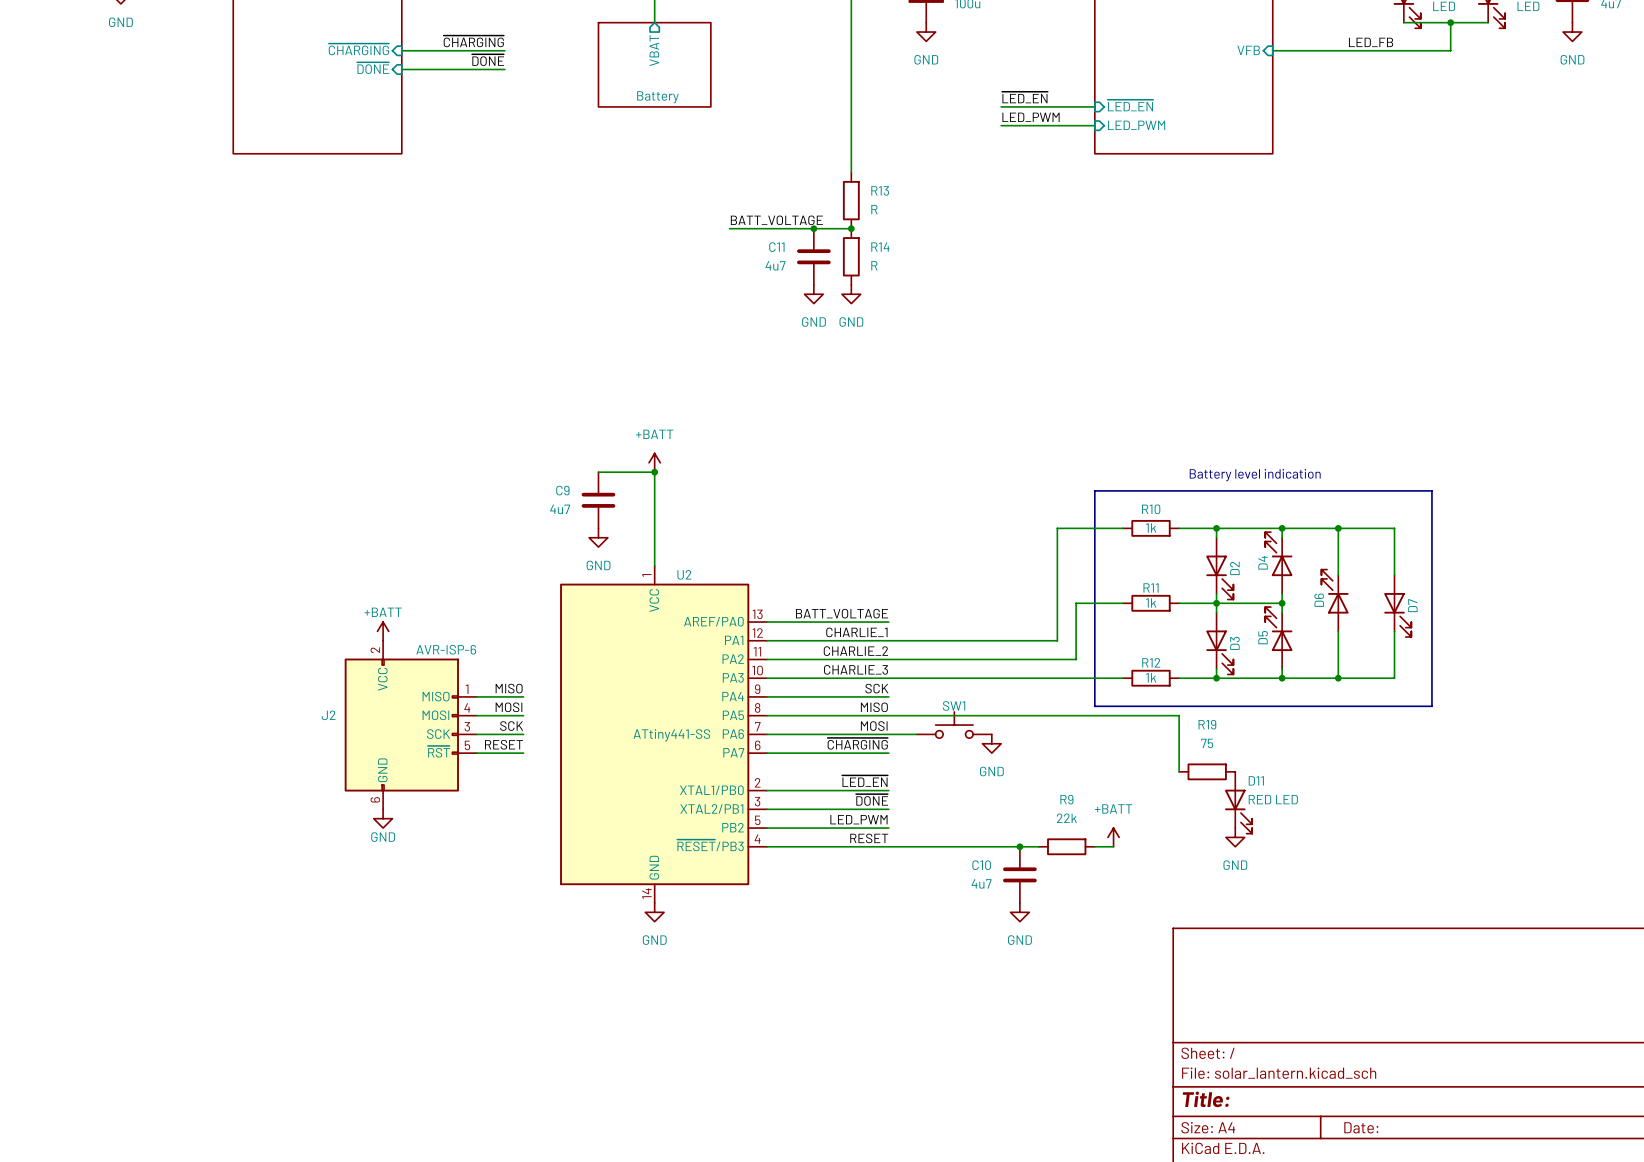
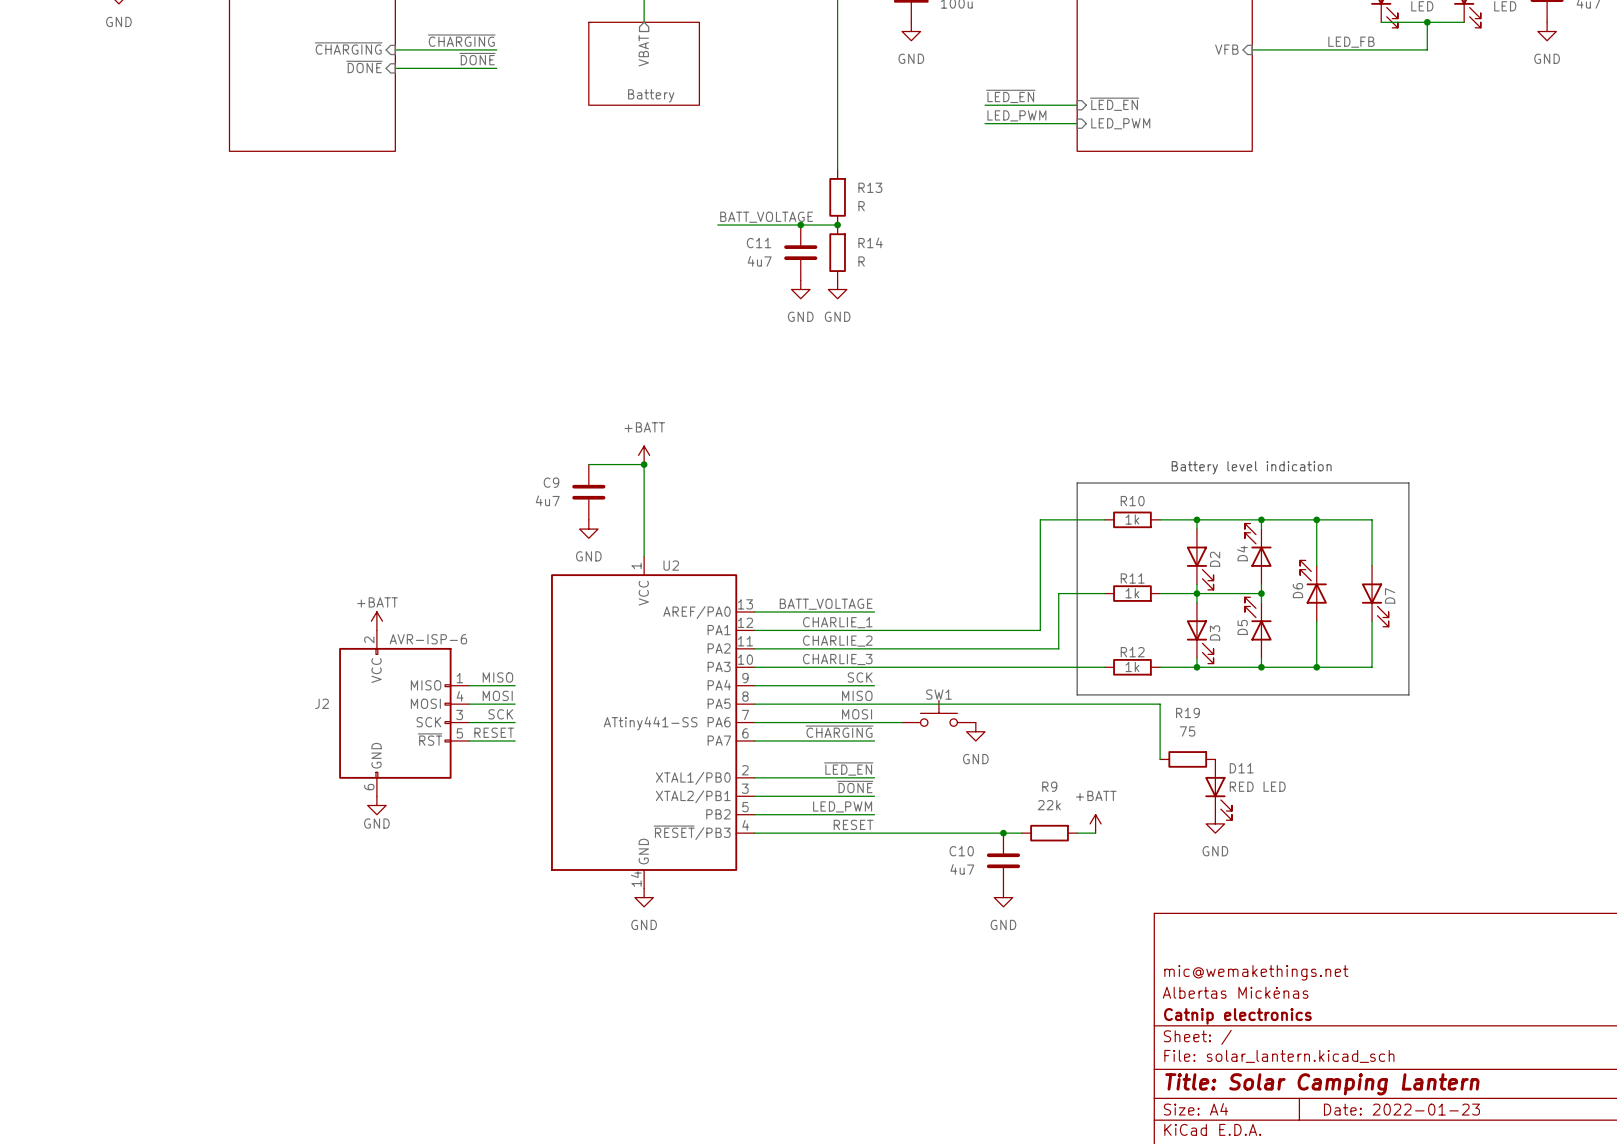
title block: none -> mic@wemakethings.net (1256, 972)
title block: none -> Albertas Mickėnas (1235, 992)
title block: none -> Catnip electronics (1237, 1016)
title block: Title: (1206, 1099) -> Title: Solar Camping Lantern (1322, 1084)
title block: Date: (1361, 1127) -> Date: 2022-01-23 (1401, 1109)

